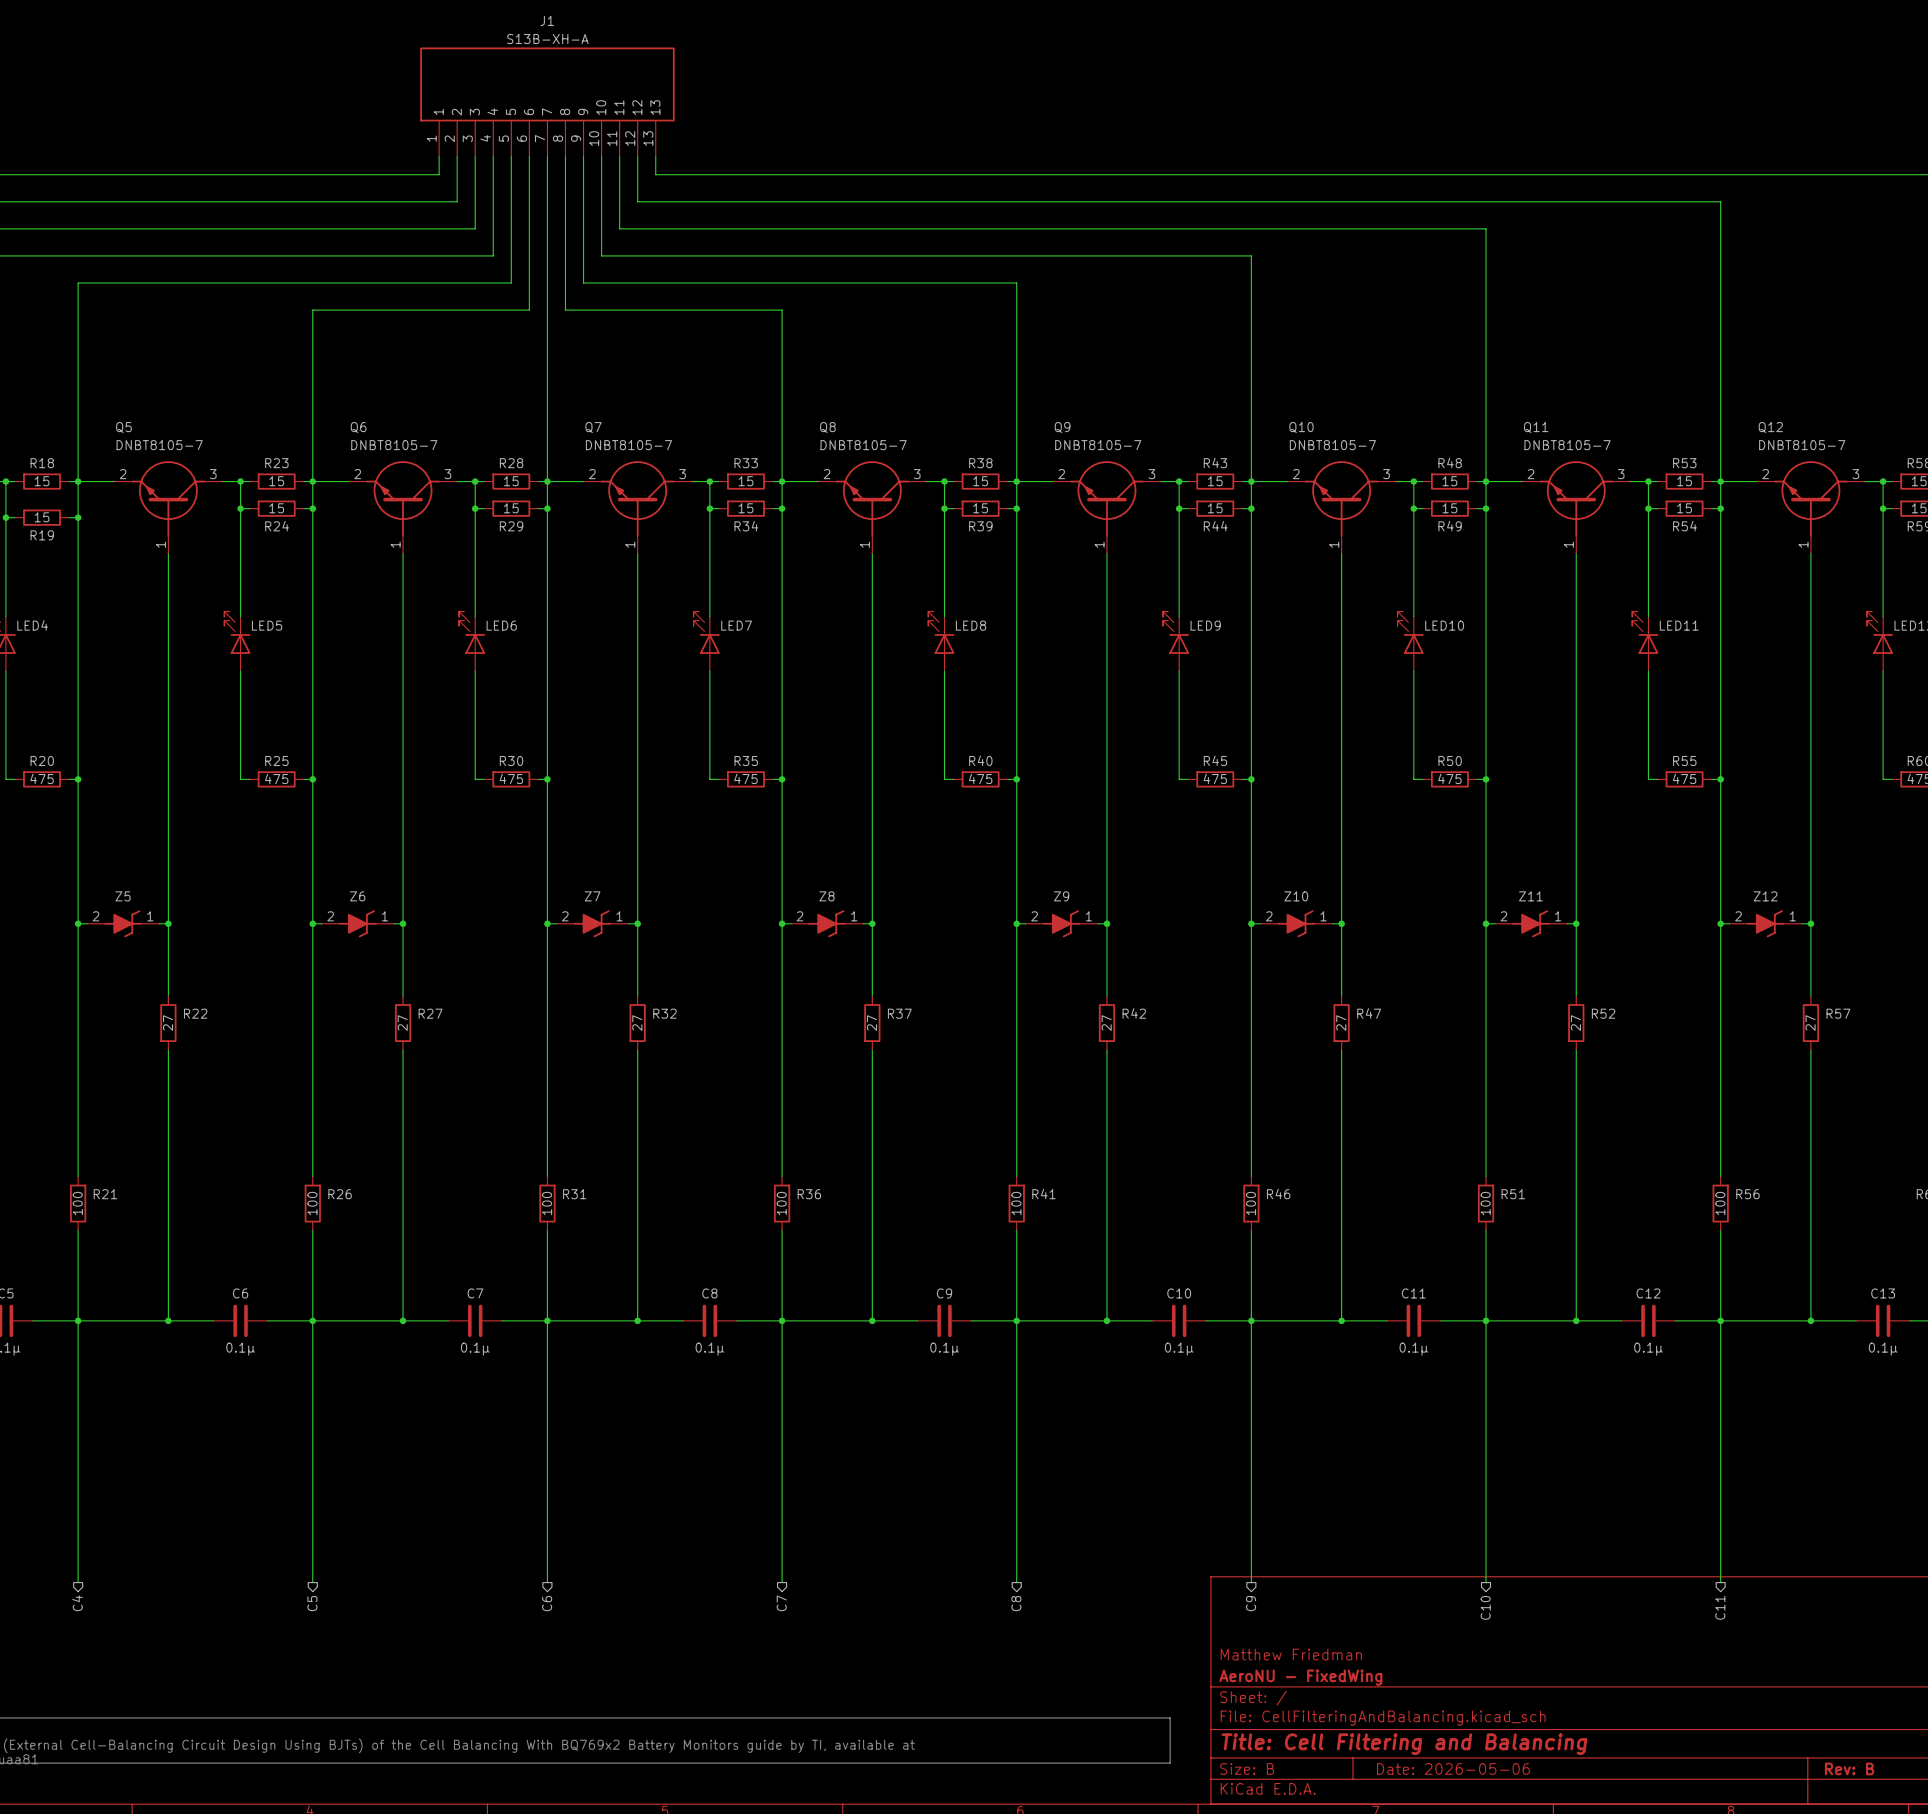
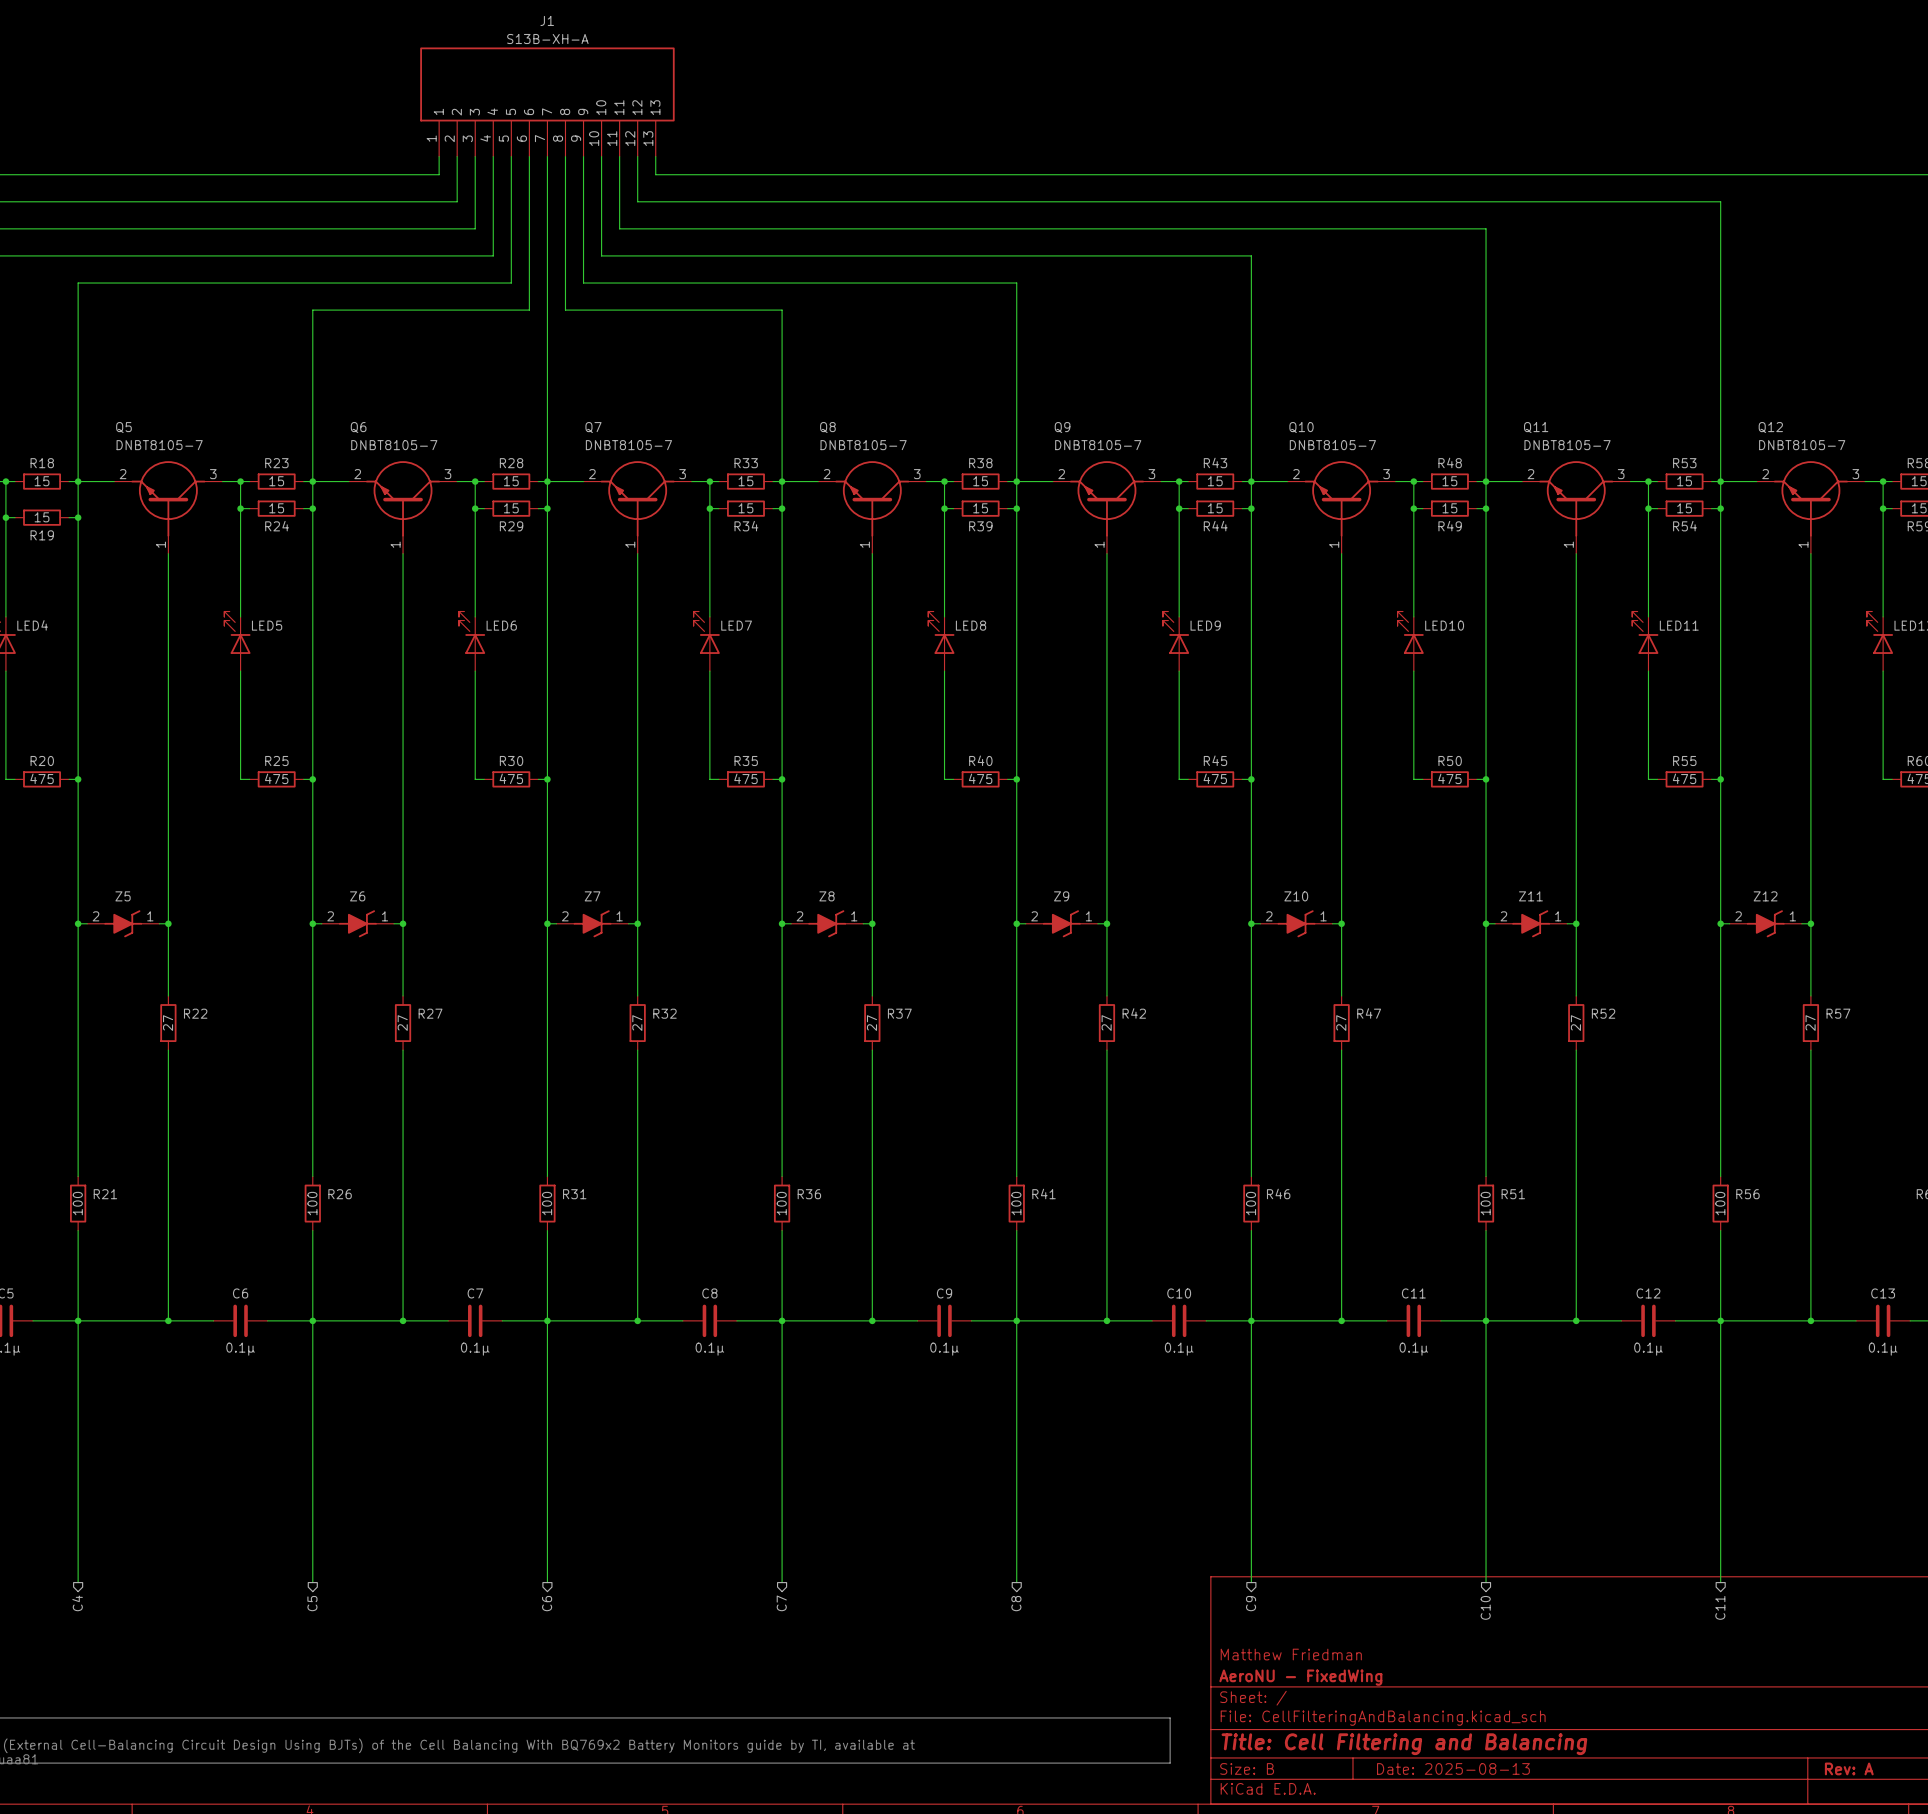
title block: Date: 2026-05-06 (1453, 1768) -> Date: 2025-08-13 (1453, 1768)
title block: Rev: B (1849, 1768) -> Rev: A (1849, 1768)

